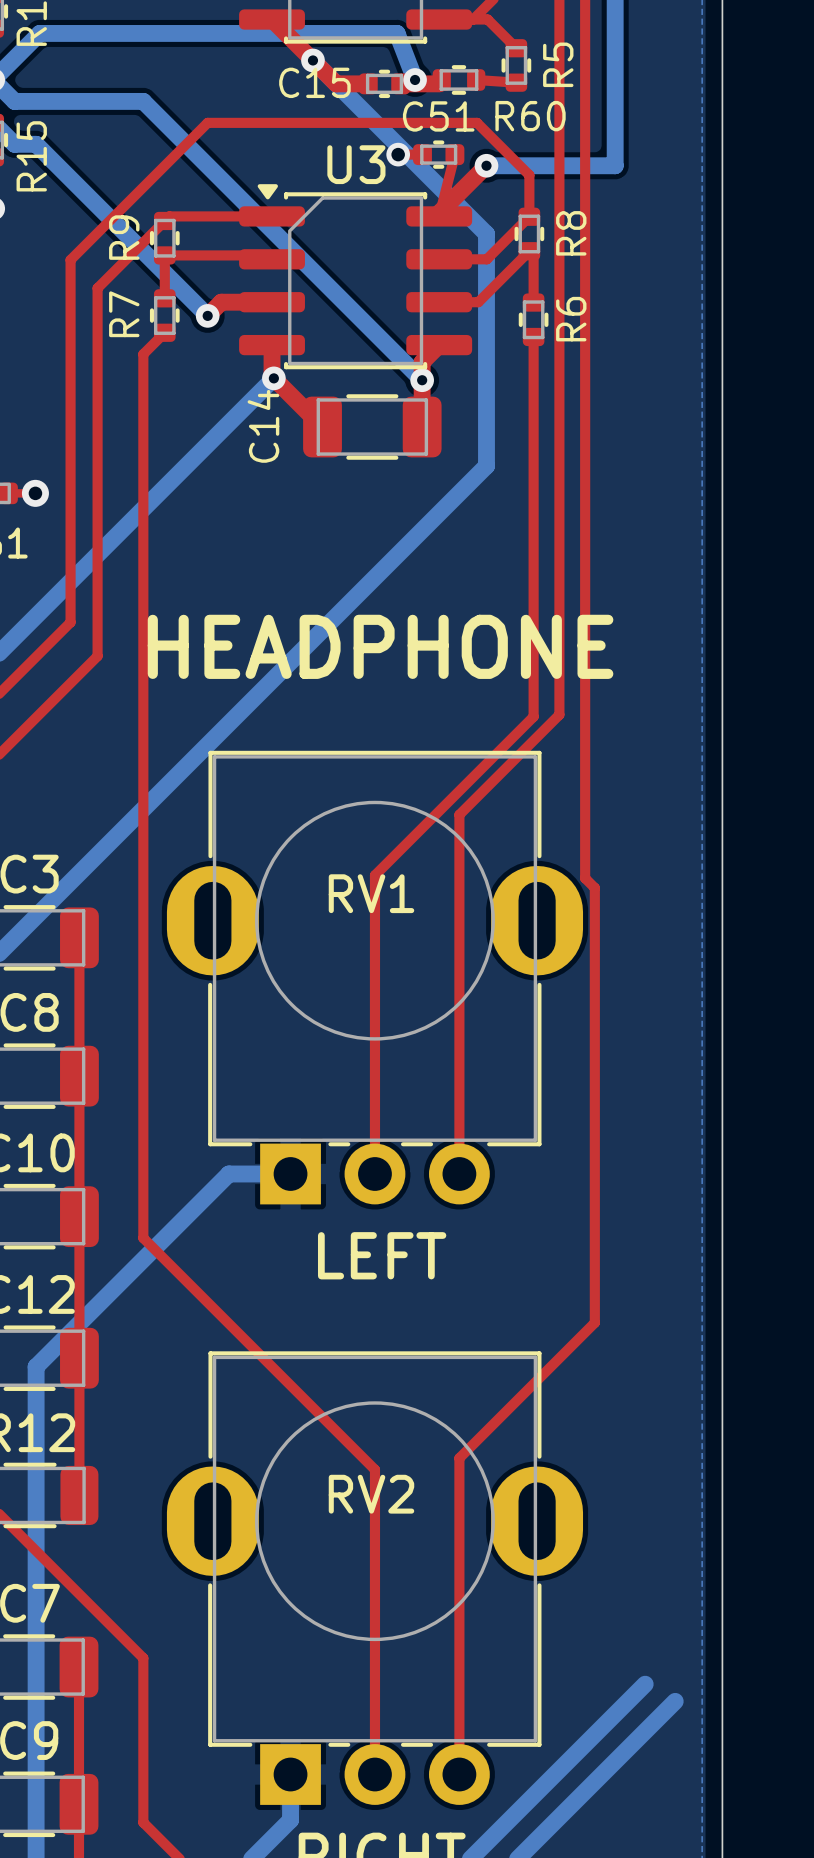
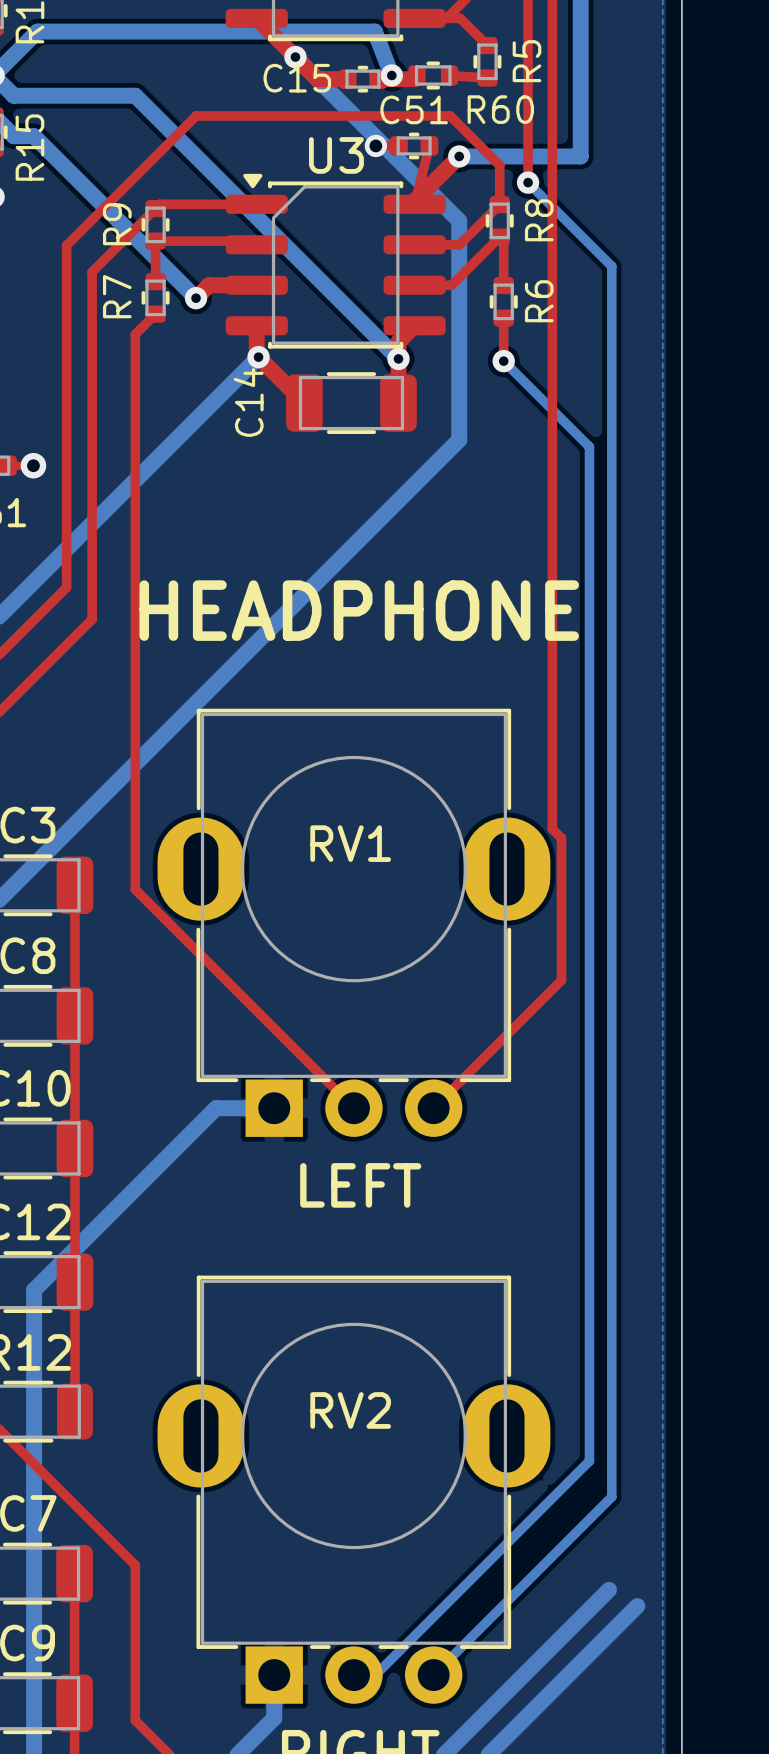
top track: (559, 193) (559, 714) (459, 814) (459, 1173) -> none
bottom track: none -> (528, 182) (611, 266) (611, 1496) (433, 1675)
via: none -> (528, 182)
top track: (533, 382) (533, 716) (374, 875) (374, 1173) -> none
bottom track: none -> (503, 361) (589, 446) (589, 1461) (375, 1675) (353, 1675)
via: none -> (503, 361)
top track: (143, 942) (143, 1238) (374, 1469) (374, 1774) -> (135, 889) (353, 1108)
top track: (594, 1038) (594, 1322) (459, 1458) (459, 1774) -> (561, 980) (433, 1108)

